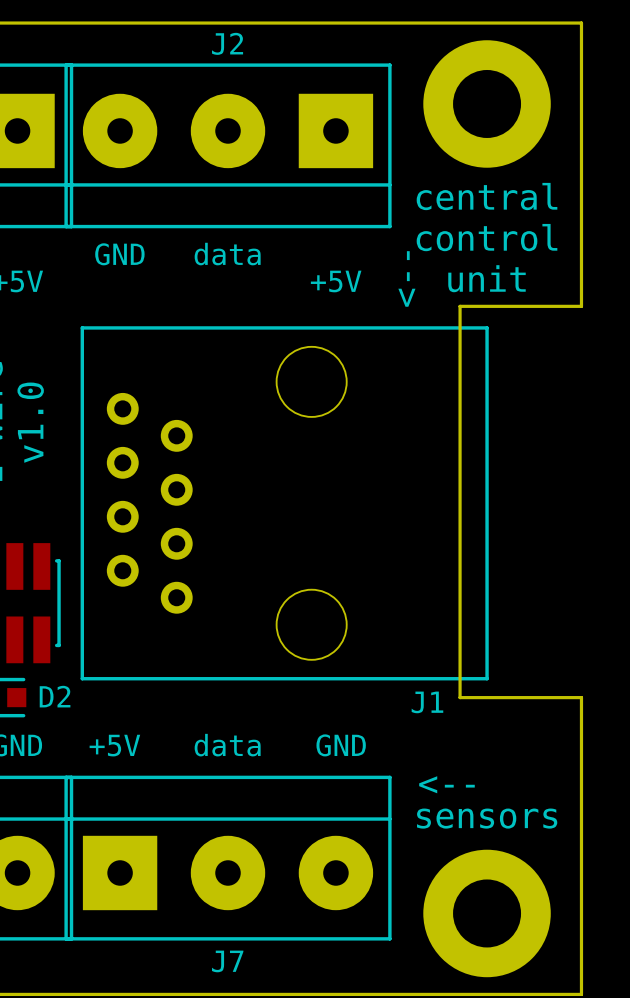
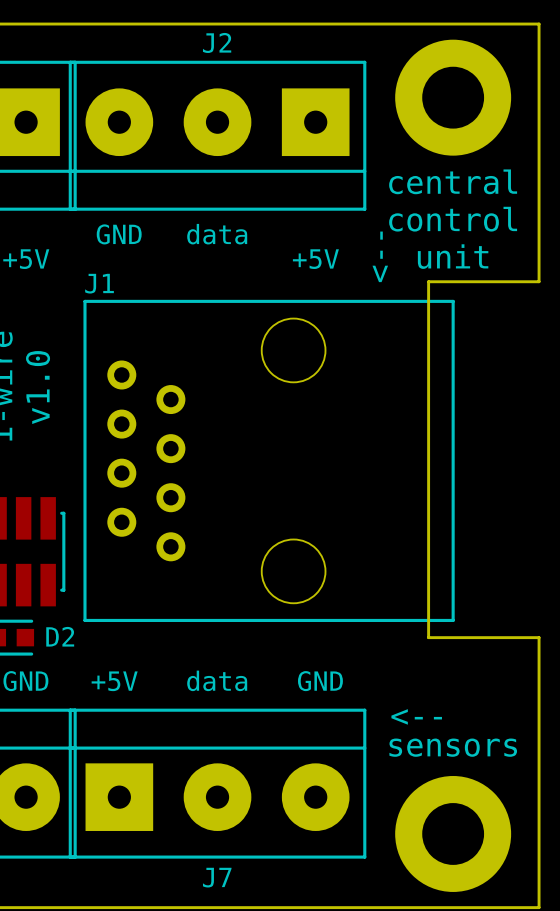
J1 name position: J1 (427, 702) -> J1 (99, 283)

